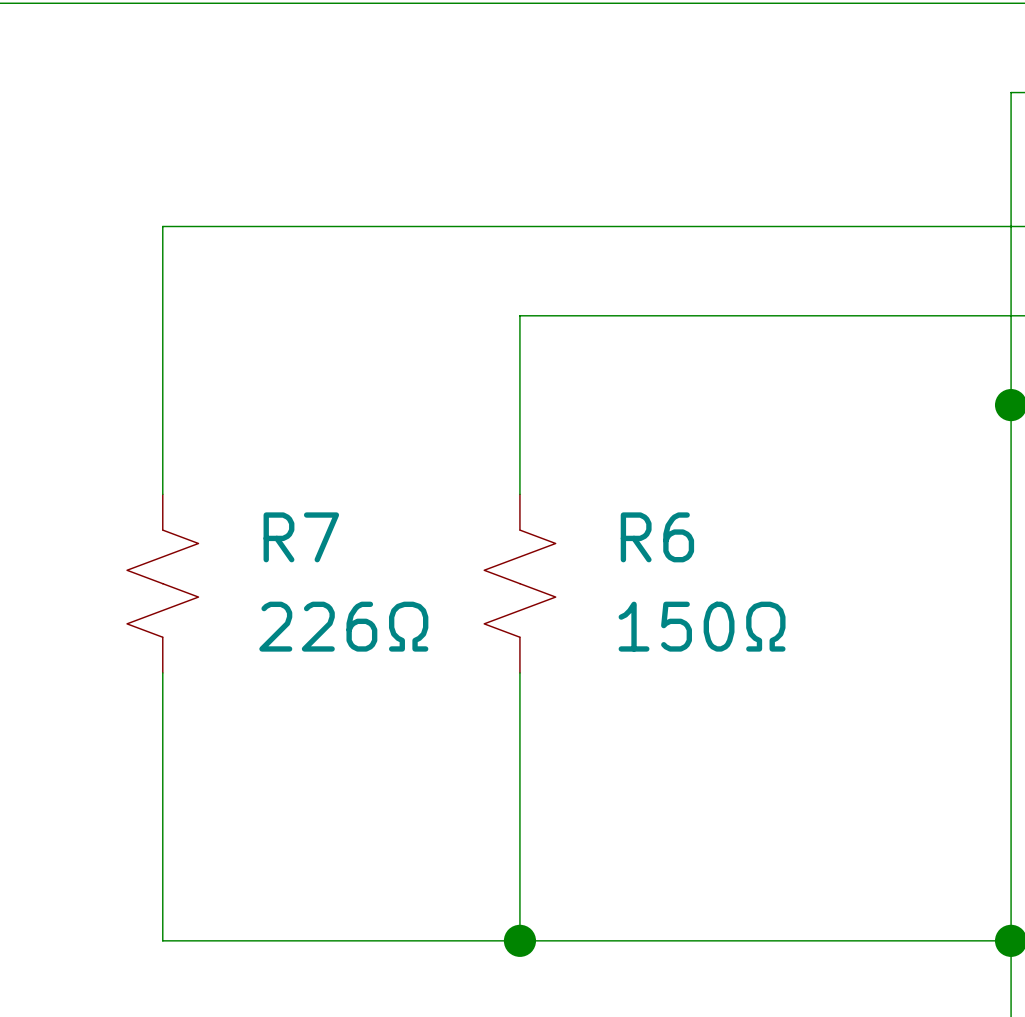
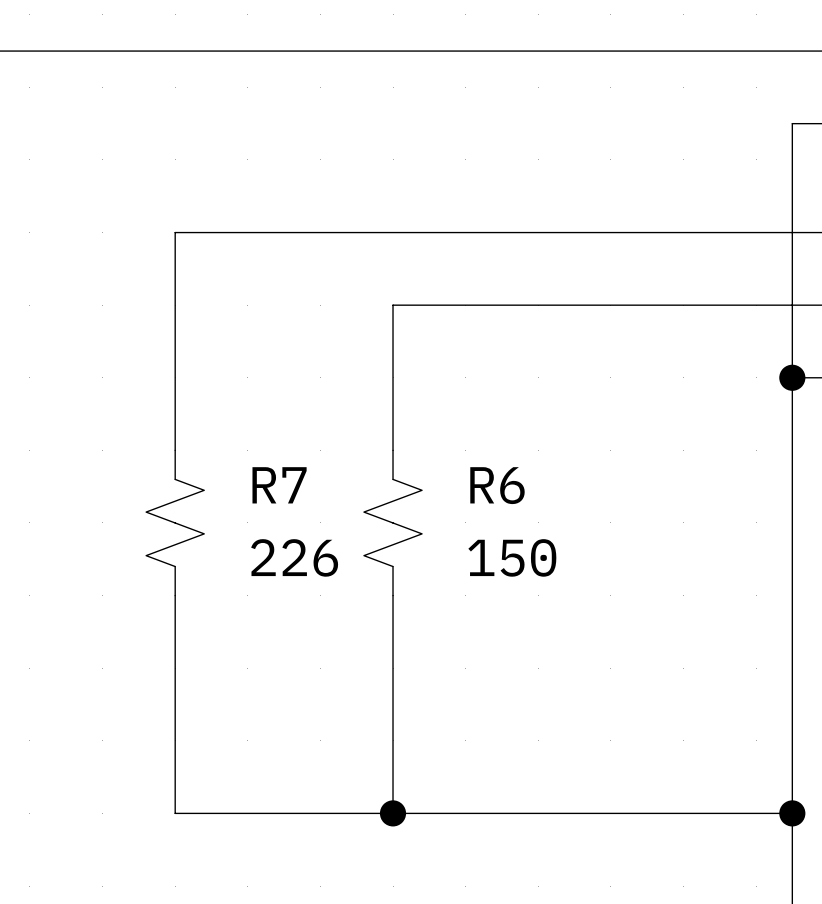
wire: (252, 226) (162, 226) (162, 494) -> (175, 232) (175, 450)
R7 position: (162, 583) -> (175, 522)
R7 value: 226Ω (343, 626) -> 226 (294, 557)
R6 value: 150Ω (702, 626) -> 150 (512, 557)
wire: (162, 672) (162, 940) (252, 940) -> (175, 595) (175, 813)

